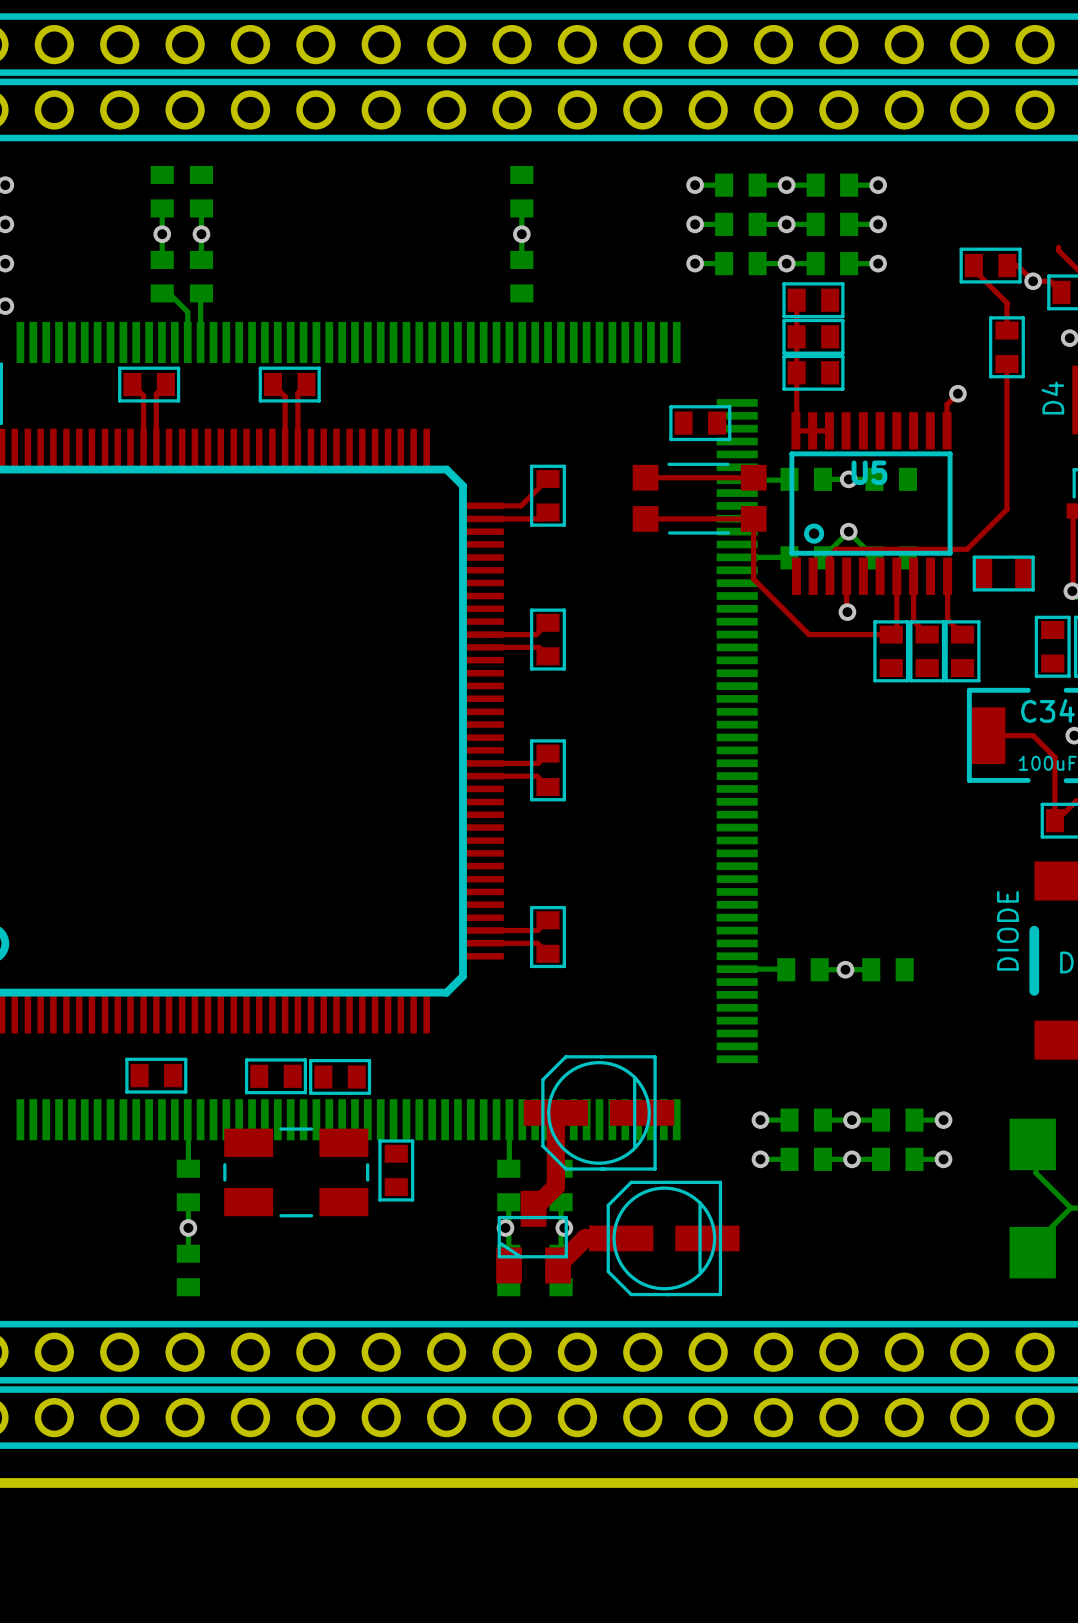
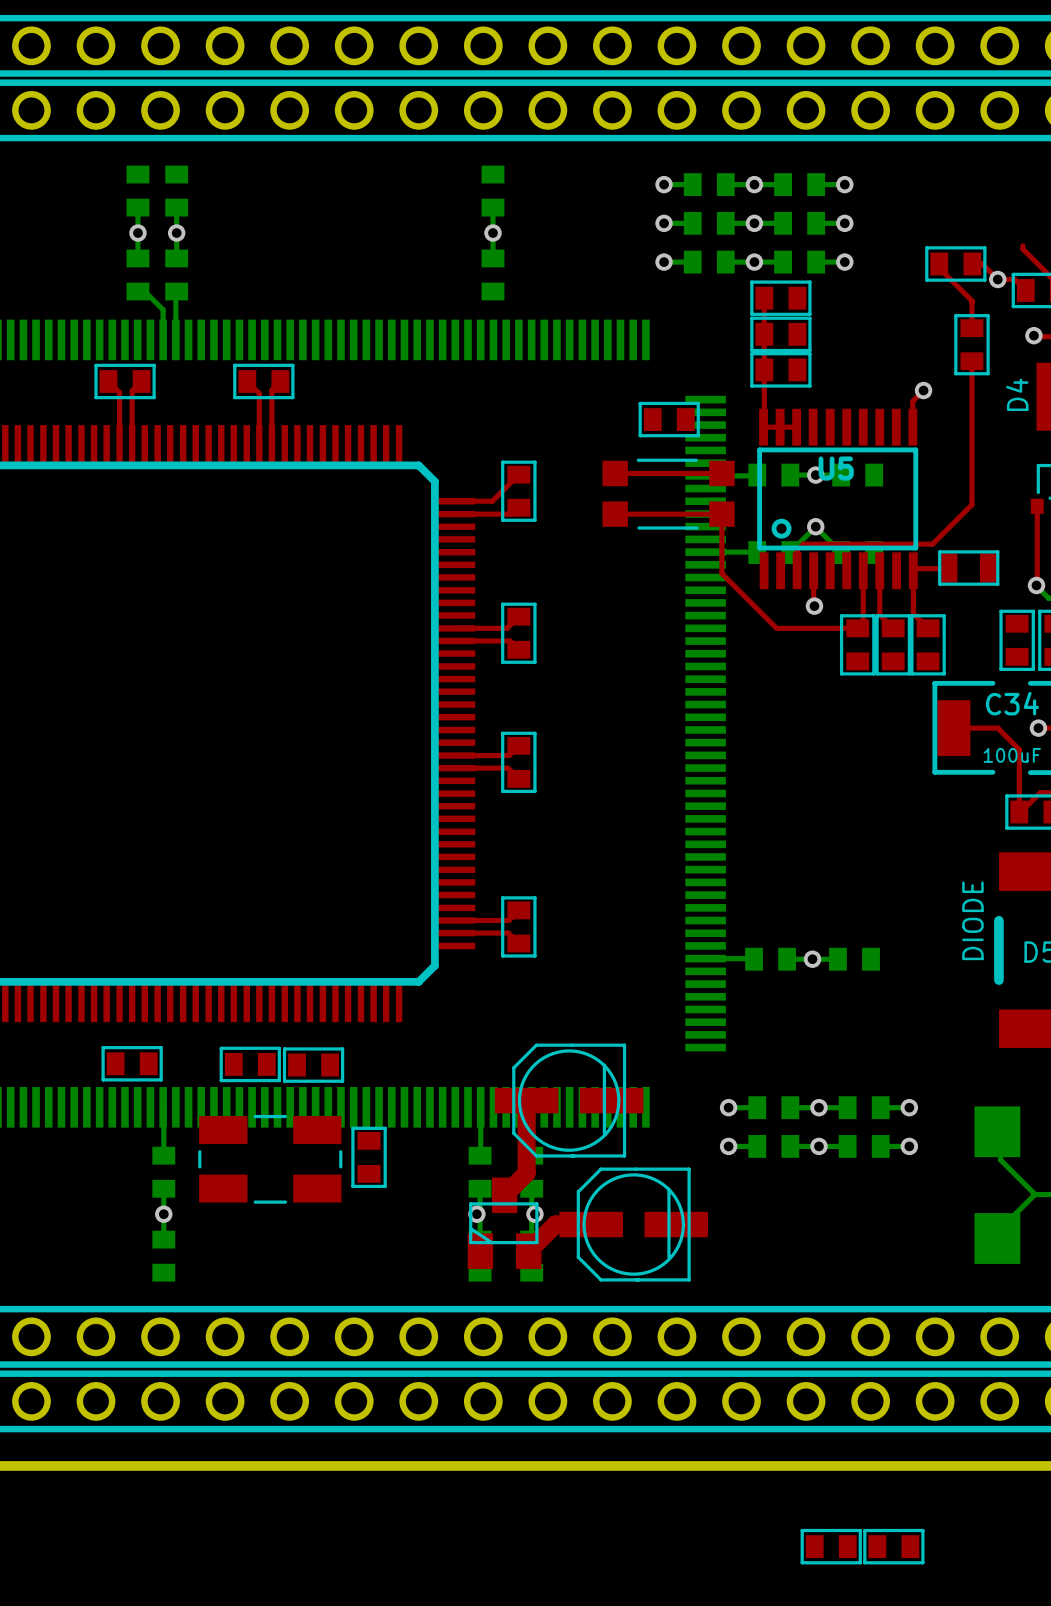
top track: none -> (950, 568) (915, 568) (913, 570)
part: none -> (831, 1546)
part: none -> (893, 1546)

